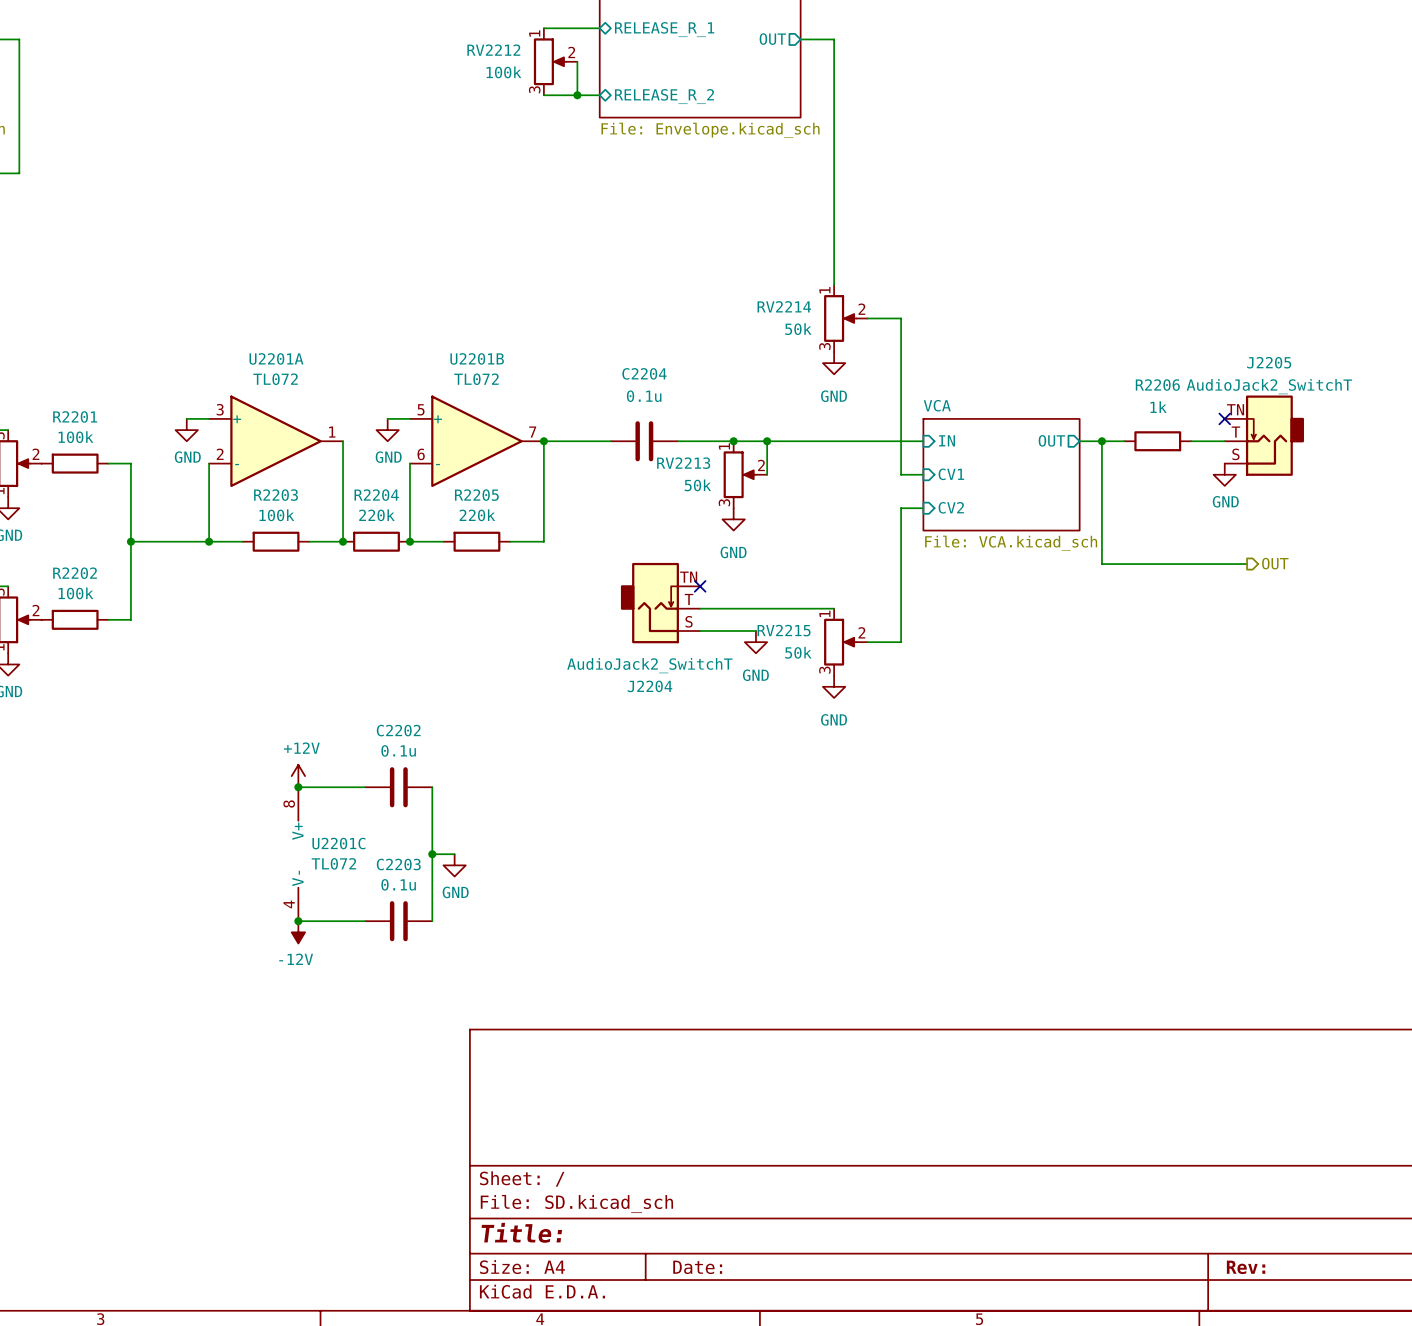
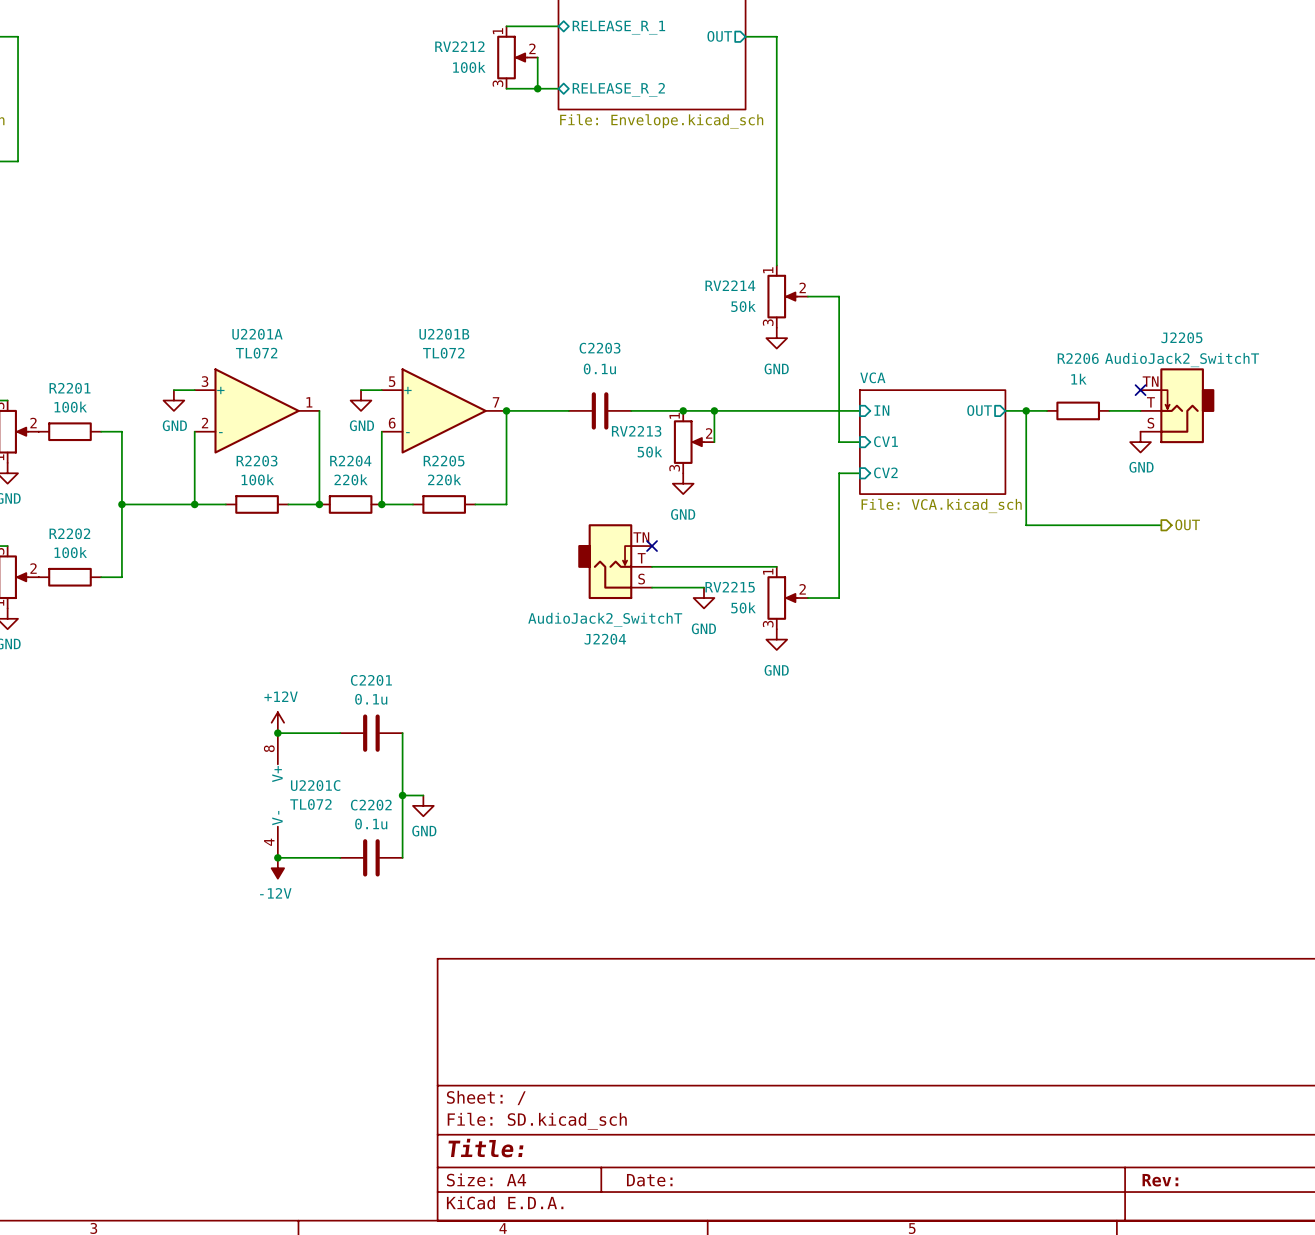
C2204 name: C2204 (644, 373) -> C2203 (600, 348)
C2202 name: C2202 (398, 730) -> C2201 (371, 680)
C2203 name: C2203 (398, 864) -> C2202 (371, 805)

